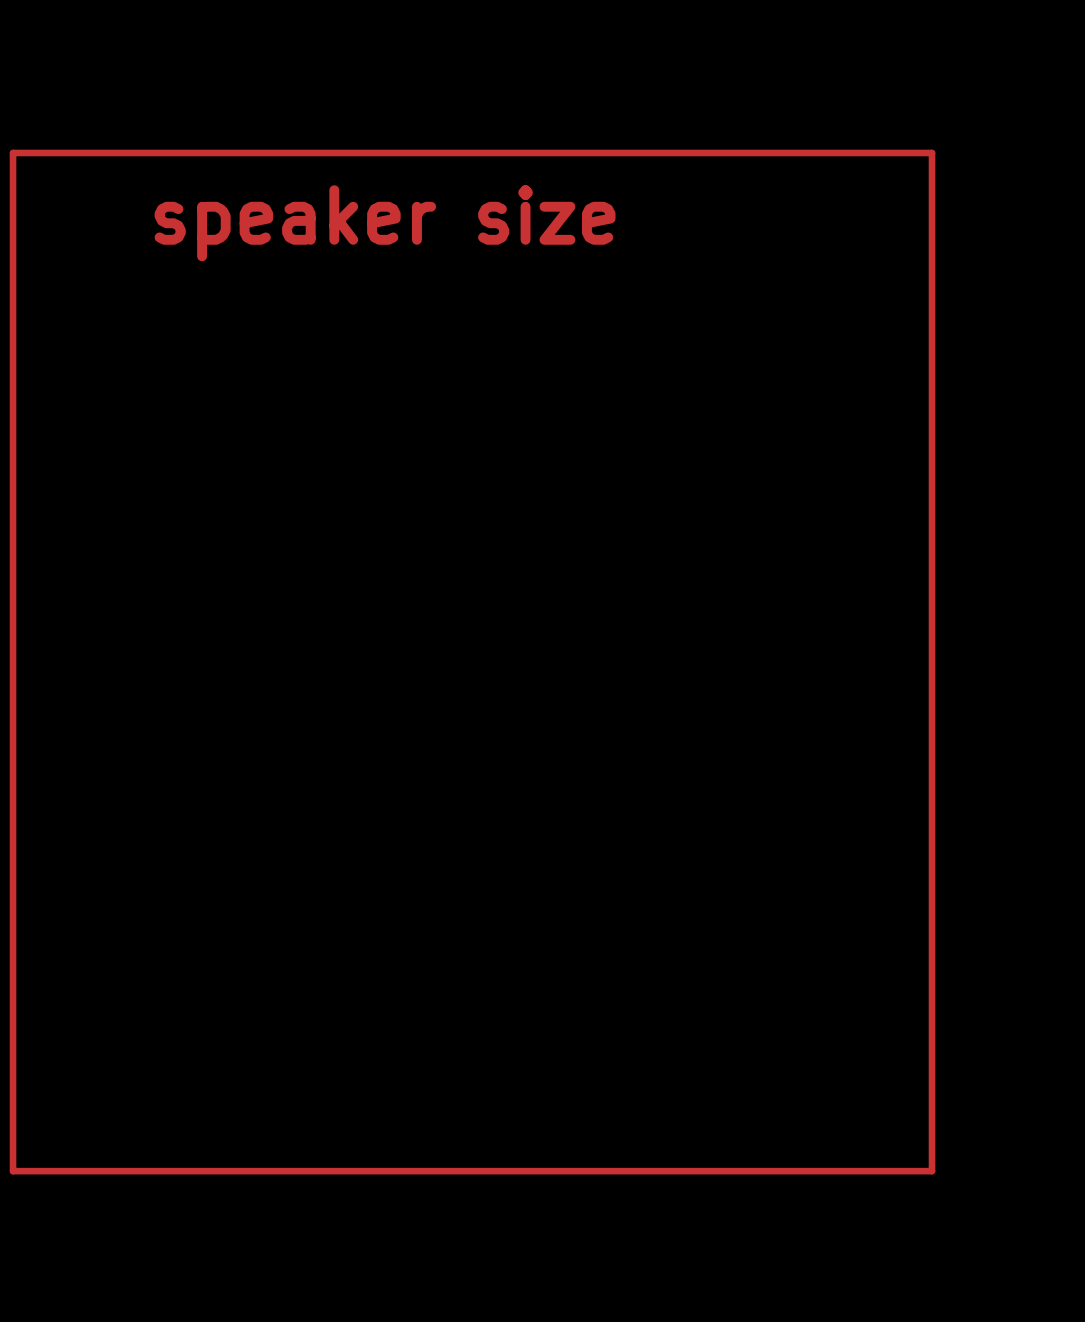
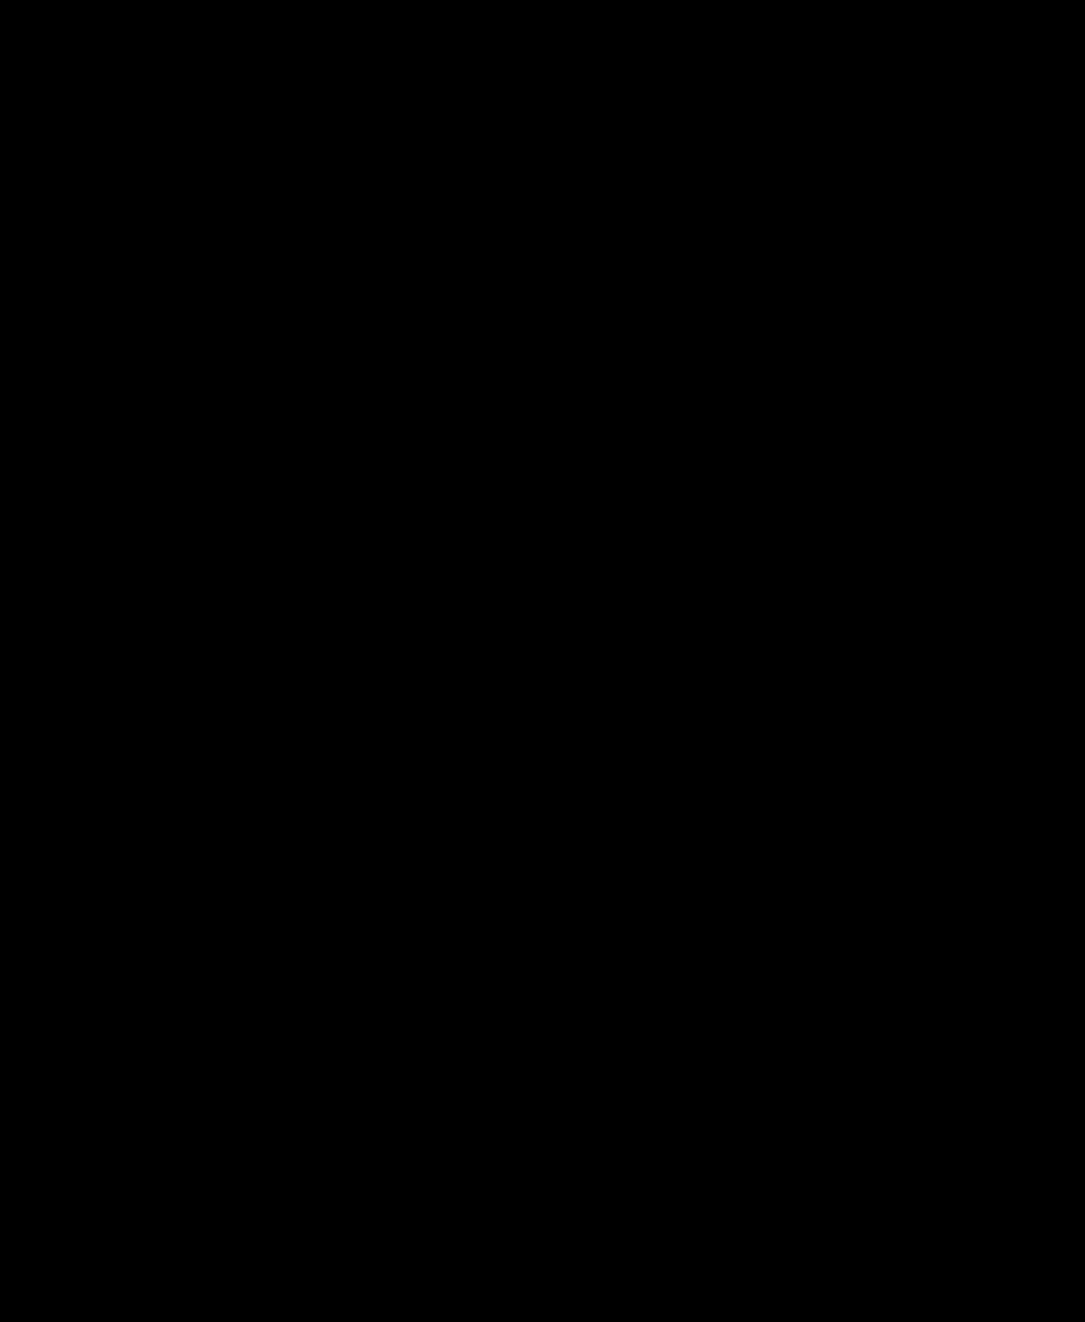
track: (13, 152) (932, 152) (932, 1171) (13, 1171) (13, 152) -> none
text: speaker size (385, 223) -> none

